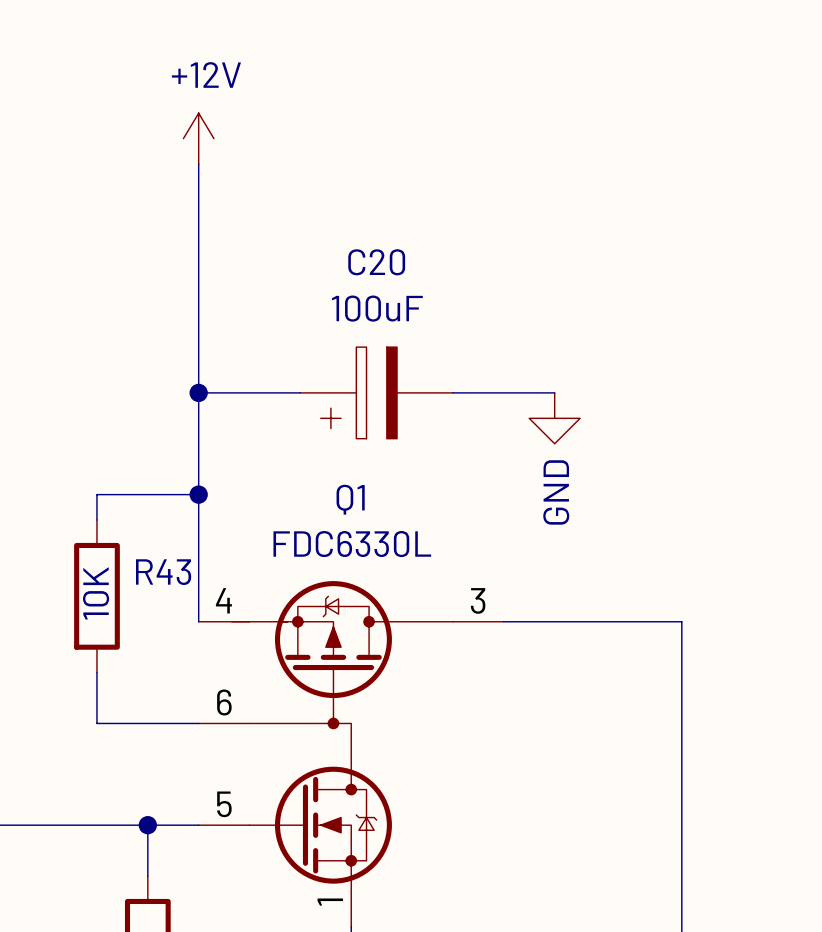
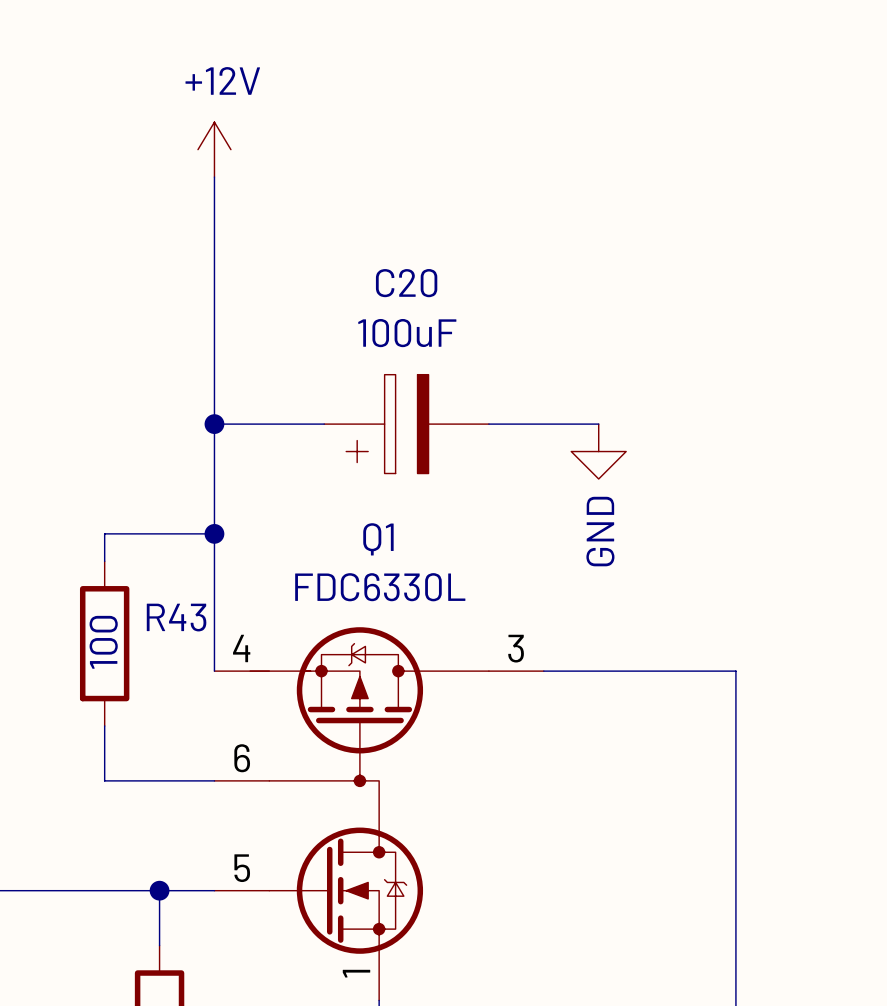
R43 value: 10K (96, 593) -> 100 (103, 642)

